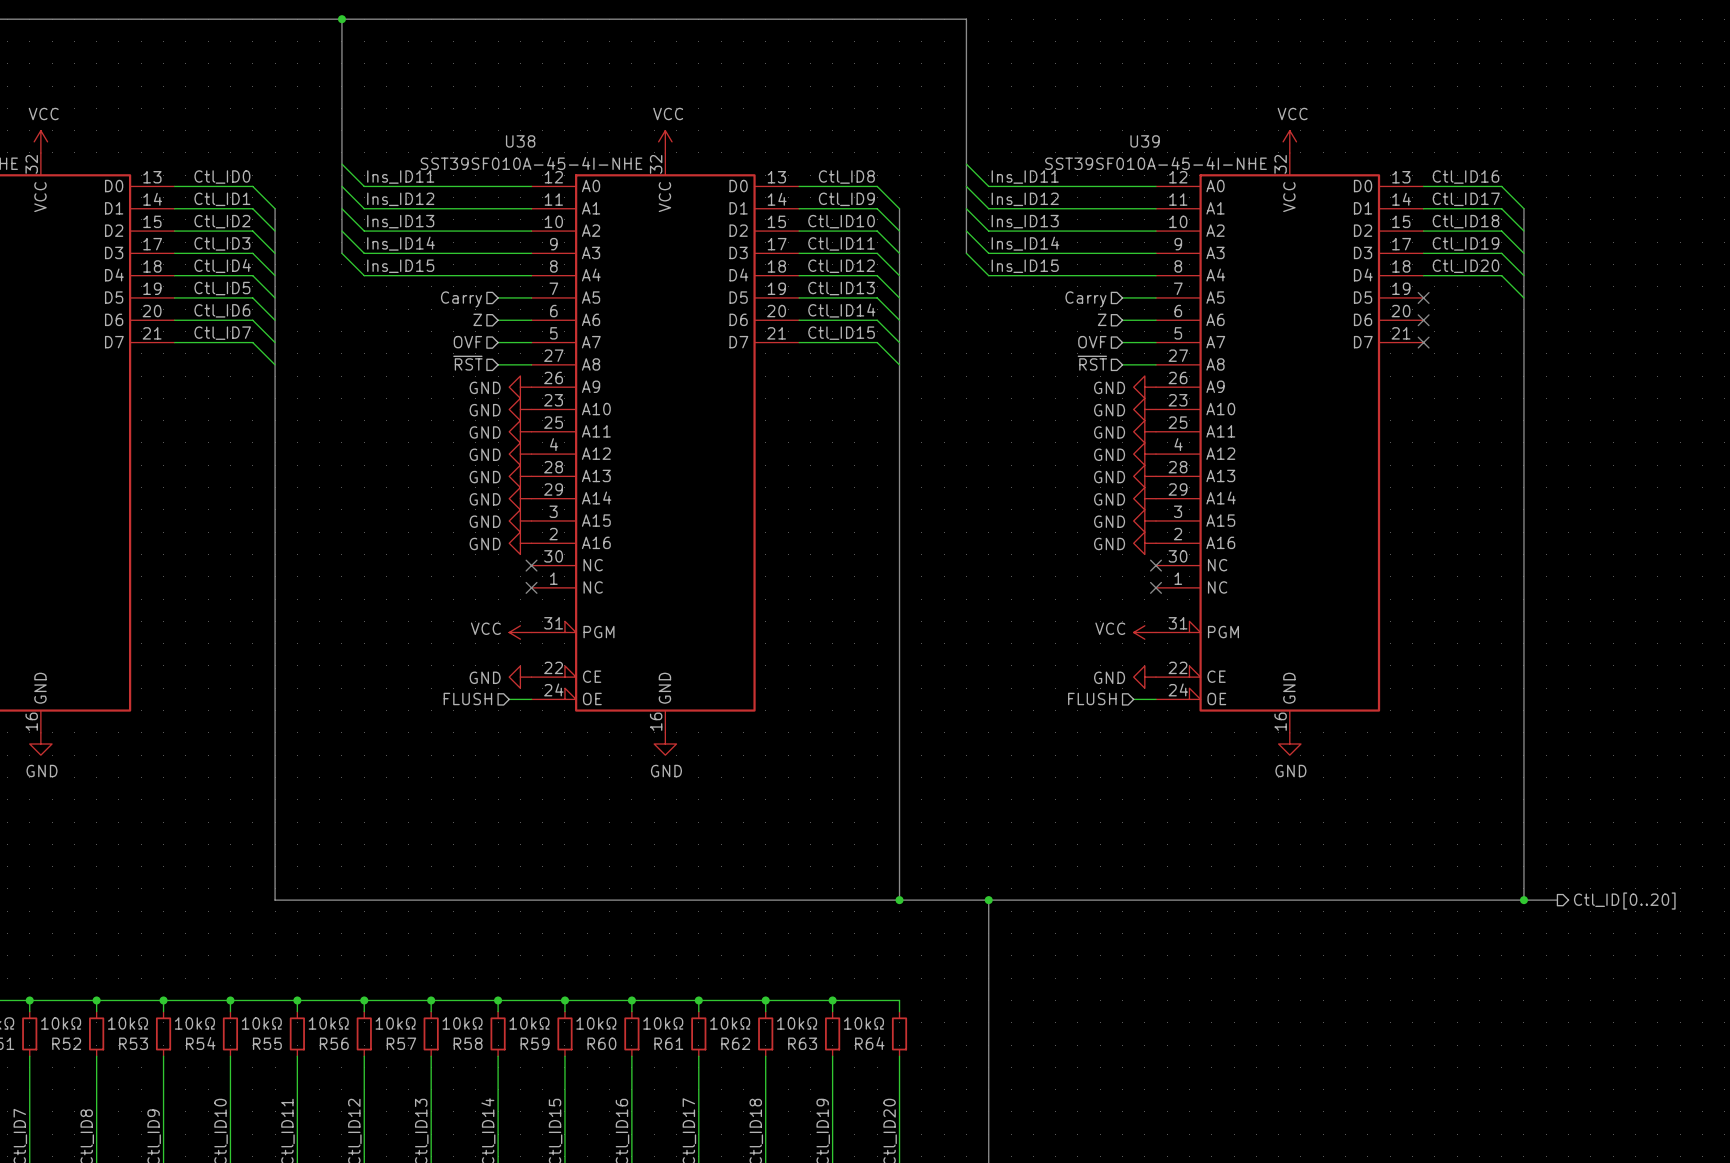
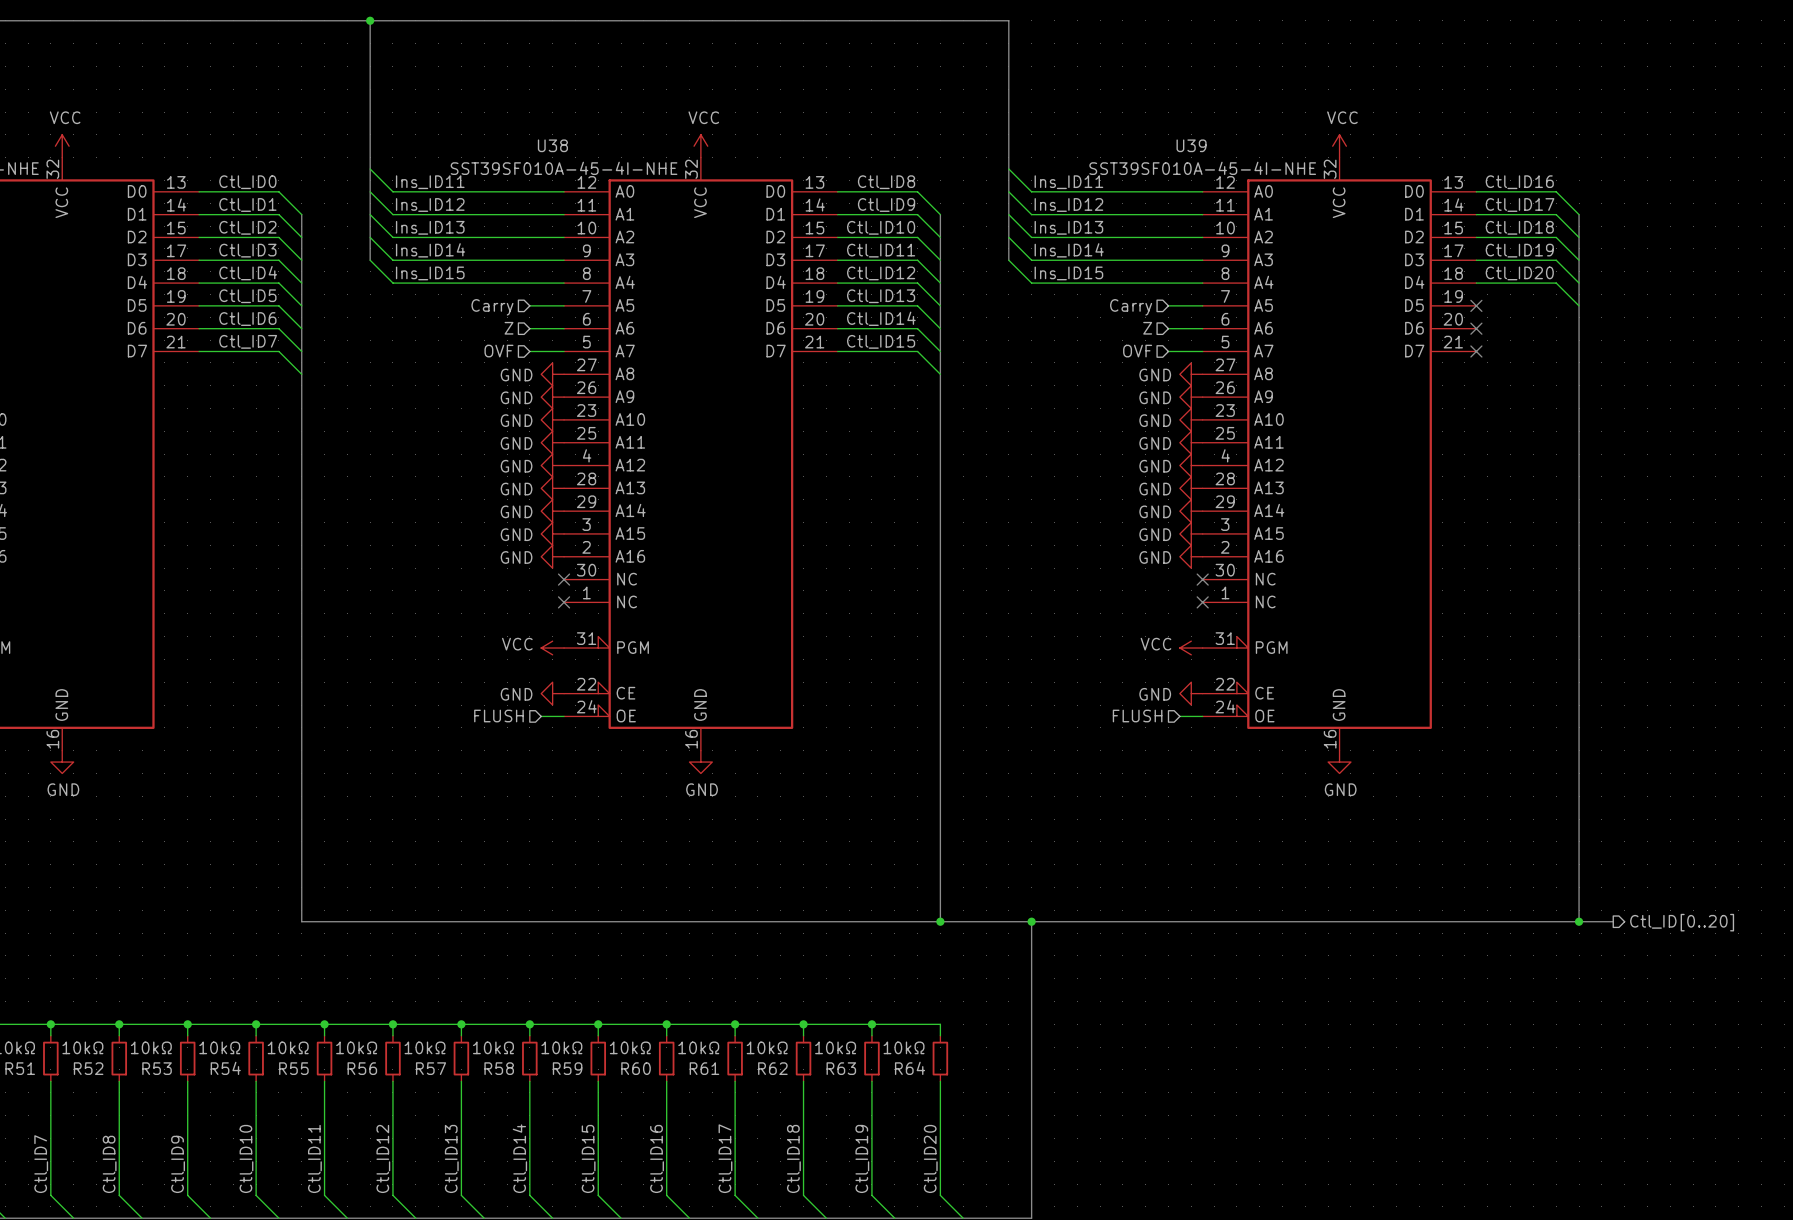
hierarchical label: ~{RST} (467, 363) -> none
hierarchical label: ~{RST} (1092, 363) -> none
wire: (498, 364) (531, 364) -> none
power symbol: none -> GND (552, 374)
wire: (1122, 364) (1155, 364) -> none
power symbol: none -> GND (1191, 374)

